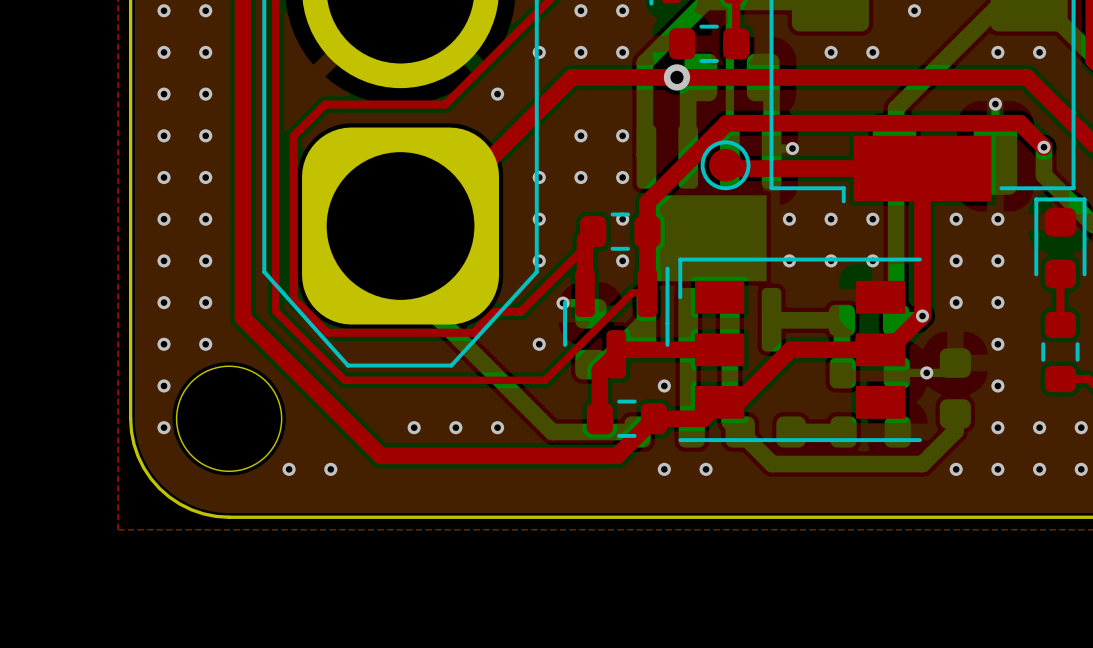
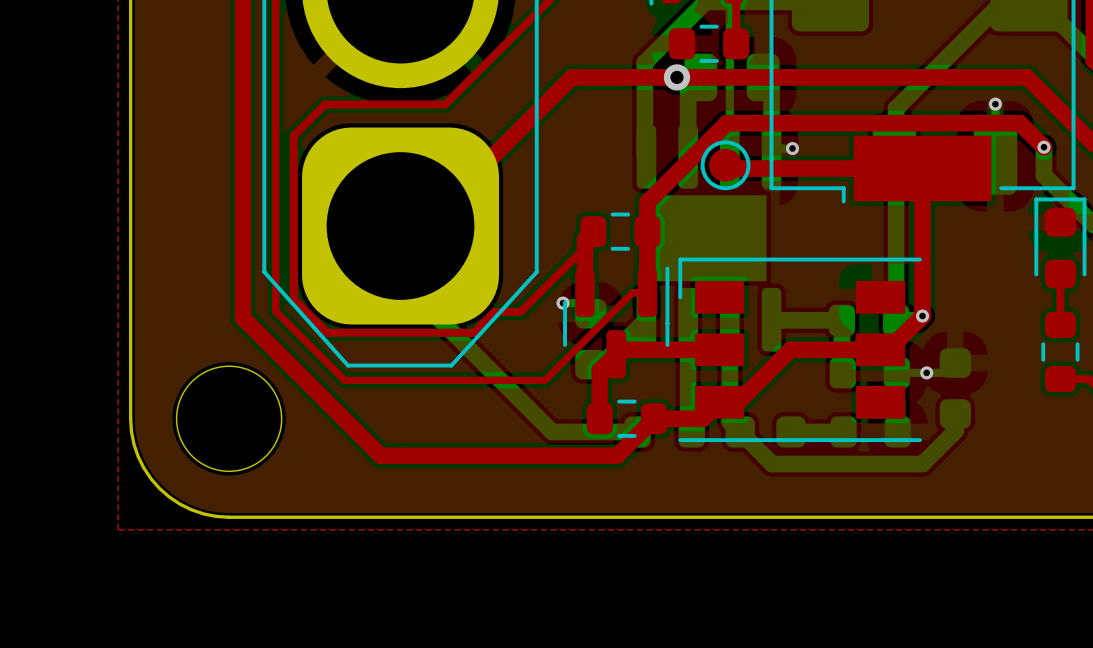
via: (164, 10) -> none
via: (205, 10) -> none
via: (580, 10) -> none
via: (622, 10) -> none
via: (914, 10) -> none
via: (164, 52) -> none
via: (205, 52) -> none
via: (539, 52) -> none
via: (580, 52) -> none
via: (622, 52) -> none
via: (831, 52) -> none
via: (872, 52) -> none
via: (997, 52) -> none
via: (1039, 52) -> none
via: (164, 94) -> none
via: (205, 94) -> none
via: (497, 94) -> none
via: (164, 135) -> none
via: (205, 135) -> none
via: (580, 135) -> none
via: (622, 135) -> none
via: (164, 177) -> none
via: (205, 177) -> none
via: (539, 177) -> none
via: (580, 177) -> none
via: (622, 177) -> none
via: (164, 219) -> none
via: (205, 219) -> none
via: (539, 219) -> none
via: (622, 219) -> none
via: (789, 219) -> none
via: (831, 219) -> none
via: (872, 219) -> none
via: (956, 219) -> none
via: (997, 219) -> none
via: (164, 260) -> none
via: (205, 260) -> none
via: (539, 260) -> none
via: (622, 260) -> none
via: (789, 260) -> none
via: (831, 260) -> none
via: (872, 260) -> none
via: (956, 260) -> none
via: (997, 260) -> none
via: (164, 302) -> none
via: (205, 302) -> none
via: (956, 302) -> none
via: (997, 302) -> none
via: (164, 344) -> none
via: (205, 344) -> none
via: (539, 344) -> none
via: (997, 344) -> none
via: (164, 385) -> none
via: (664, 385) -> none
via: (997, 385) -> none
via: (164, 427) -> none
via: (414, 427) -> none
via: (455, 427) -> none
via: (497, 427) -> none
via: (997, 427) -> none
via: (1039, 427) -> none
via: (1081, 427) -> none
via: (289, 469) -> none
via: (330, 469) -> none
via: (664, 469) -> none
via: (706, 469) -> none
via: (956, 469) -> none
via: (997, 469) -> none
via: (1039, 469) -> none
via: (1081, 469) -> none

